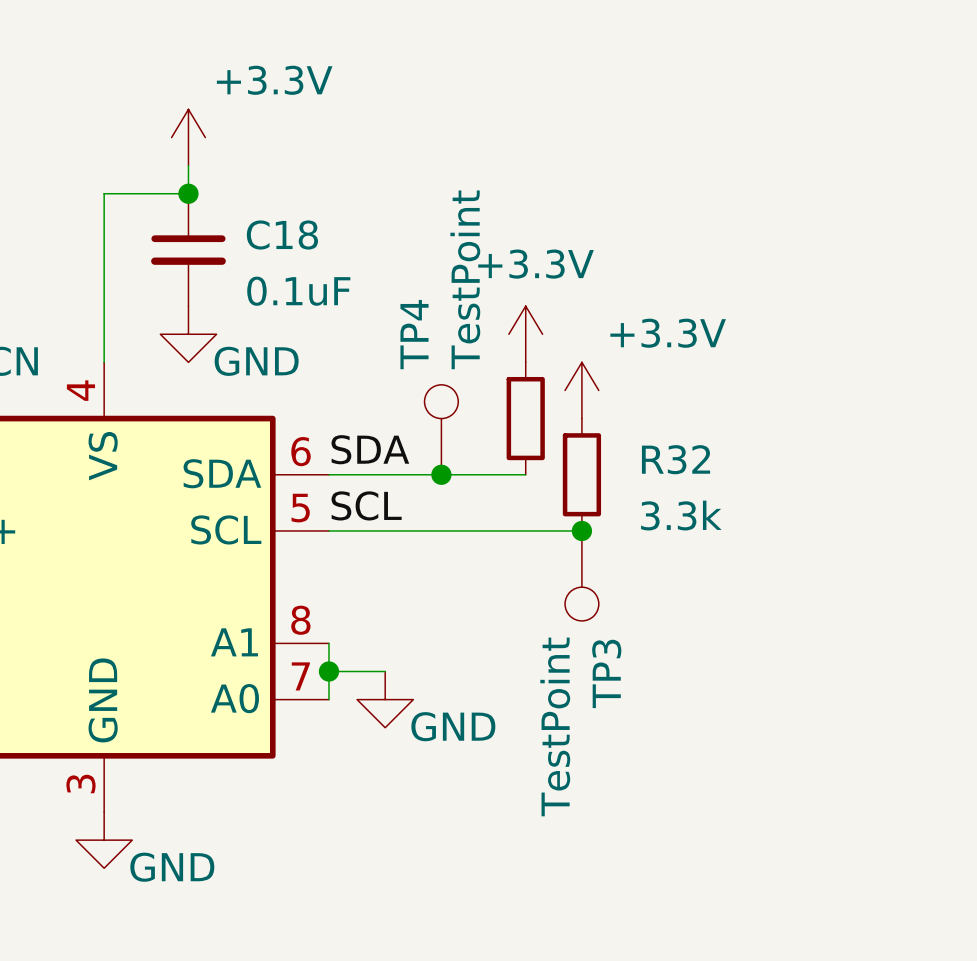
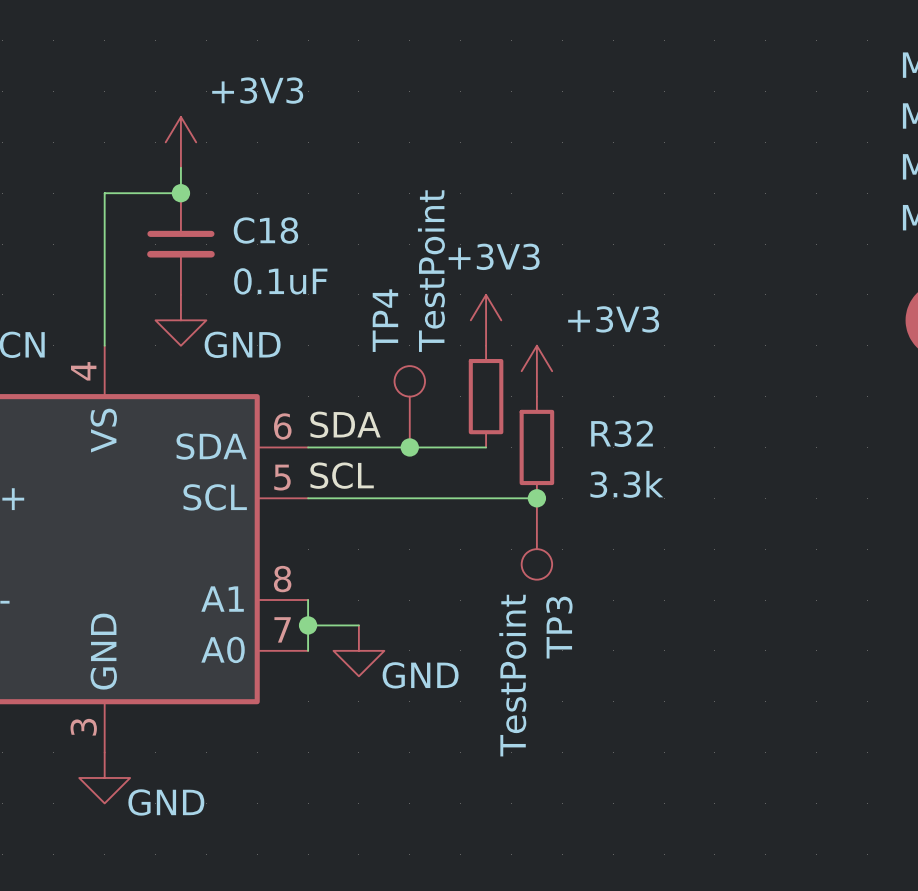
power symbol: +3.3V (188, 137) -> +3V3 (180, 142)
power symbol: +3.3V (525, 334) -> +3V3 (486, 320)
power symbol: +3.3V (581, 390) -> +3V3 (536, 371)

